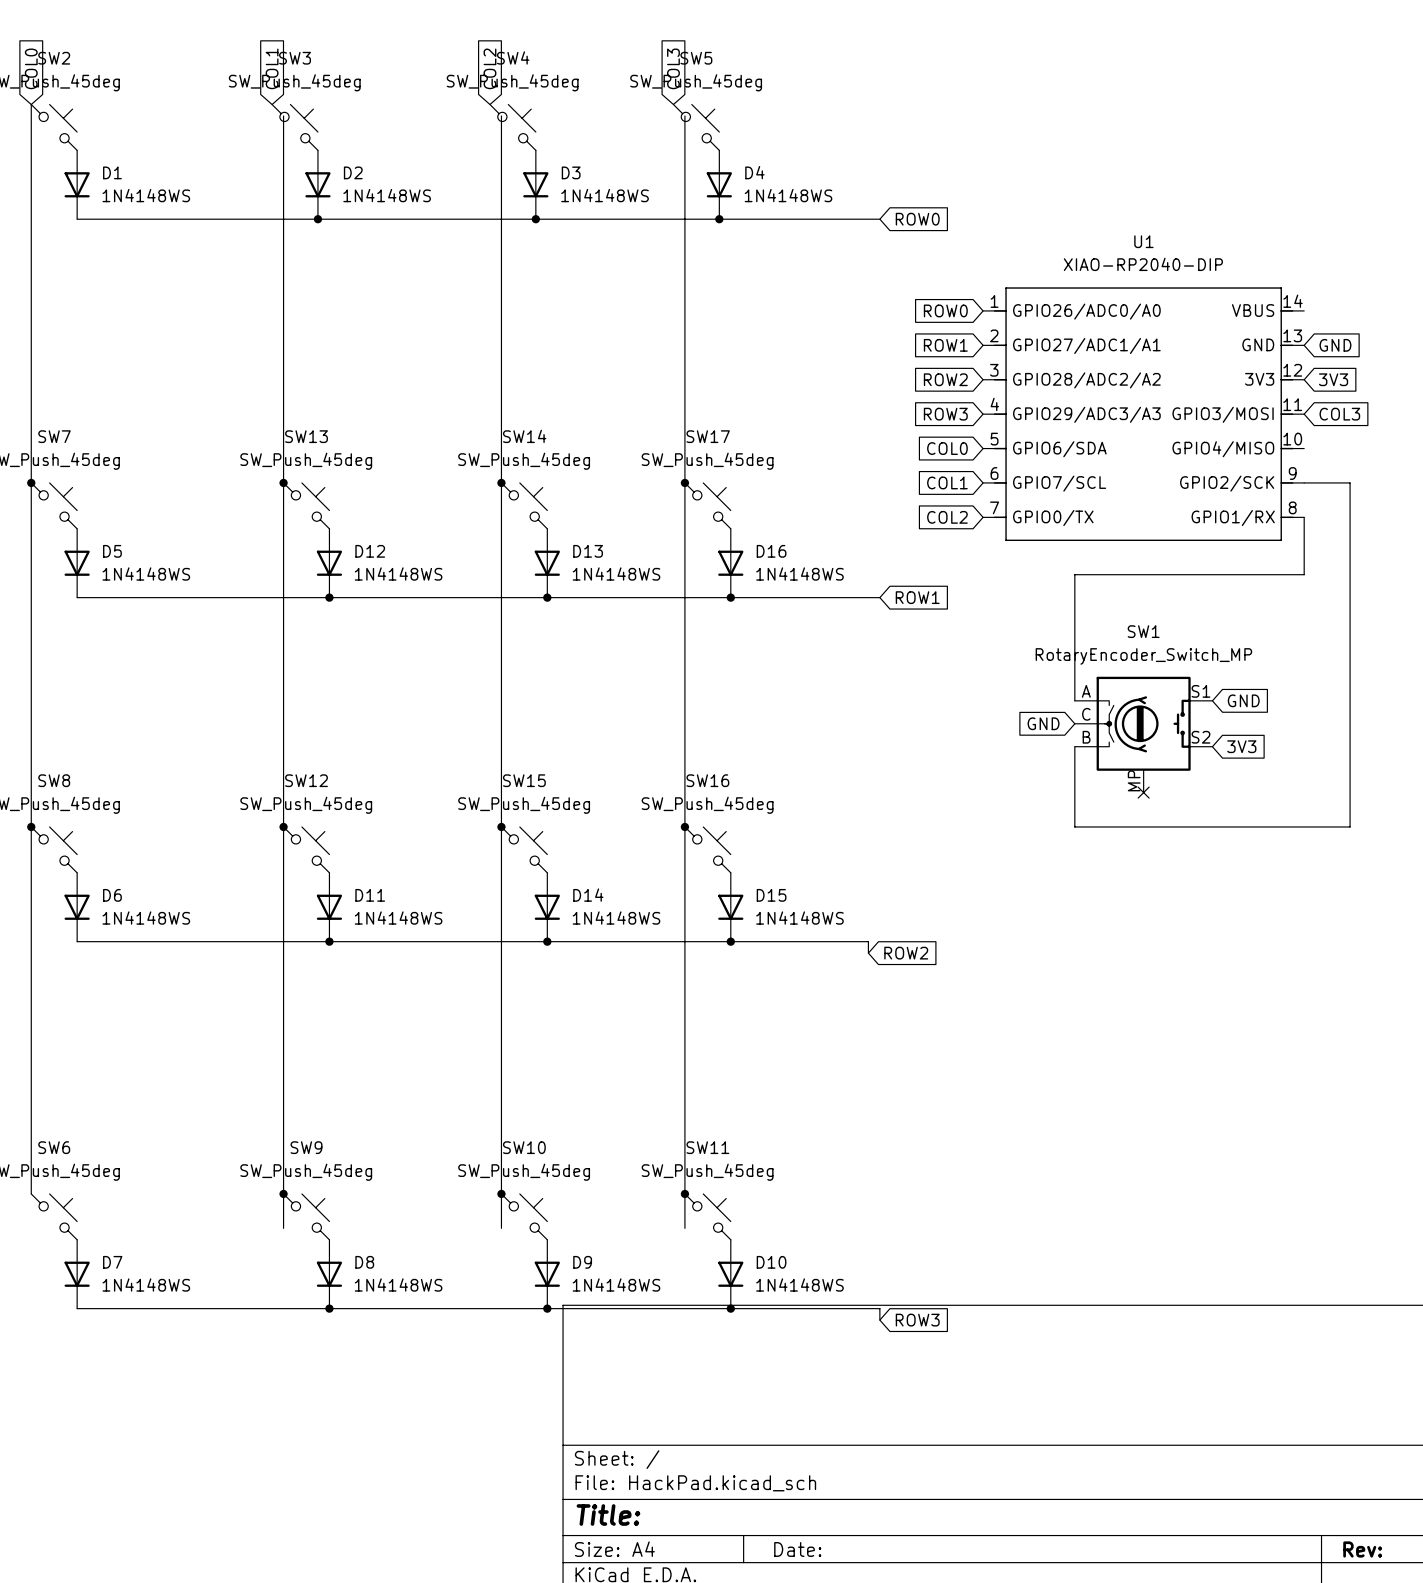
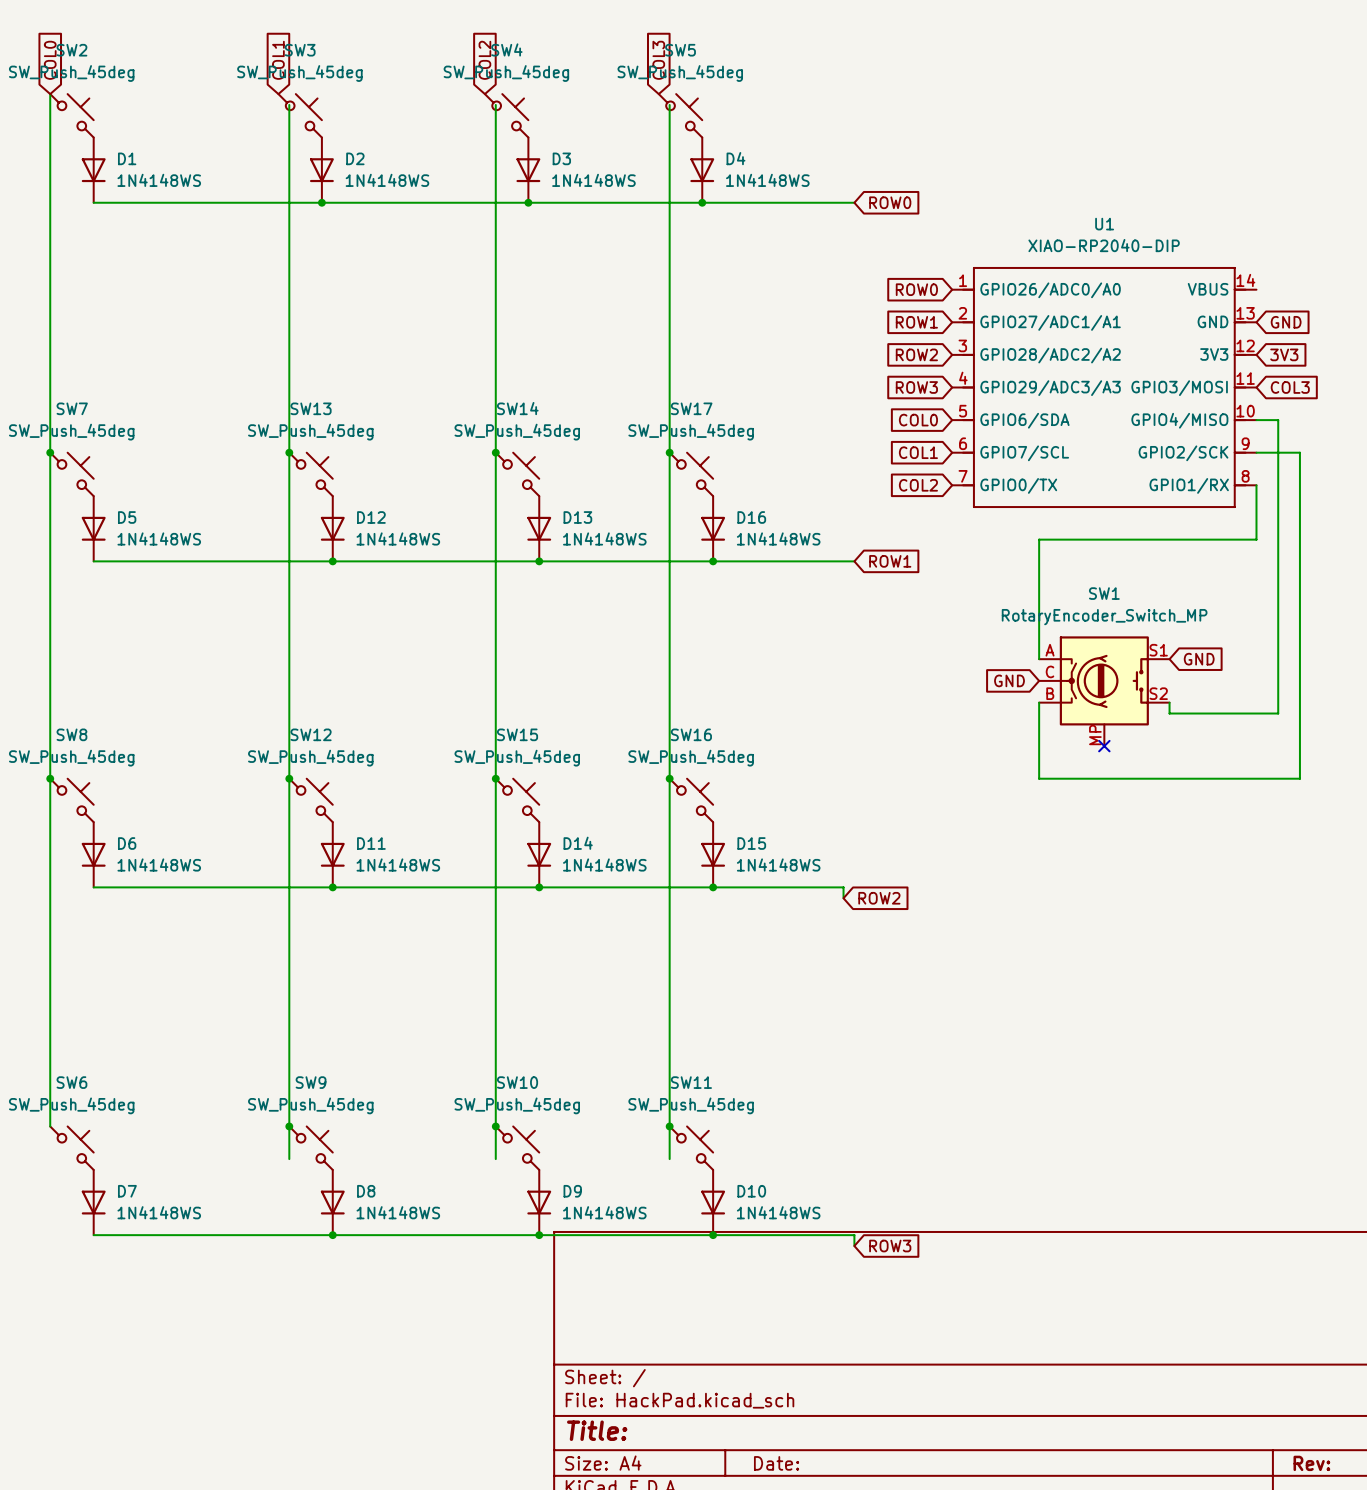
wire: none -> (1256, 420) (1278, 420) (1278, 713) (1169, 713) (1169, 702)
global label: 3V3 (1241, 746) -> none

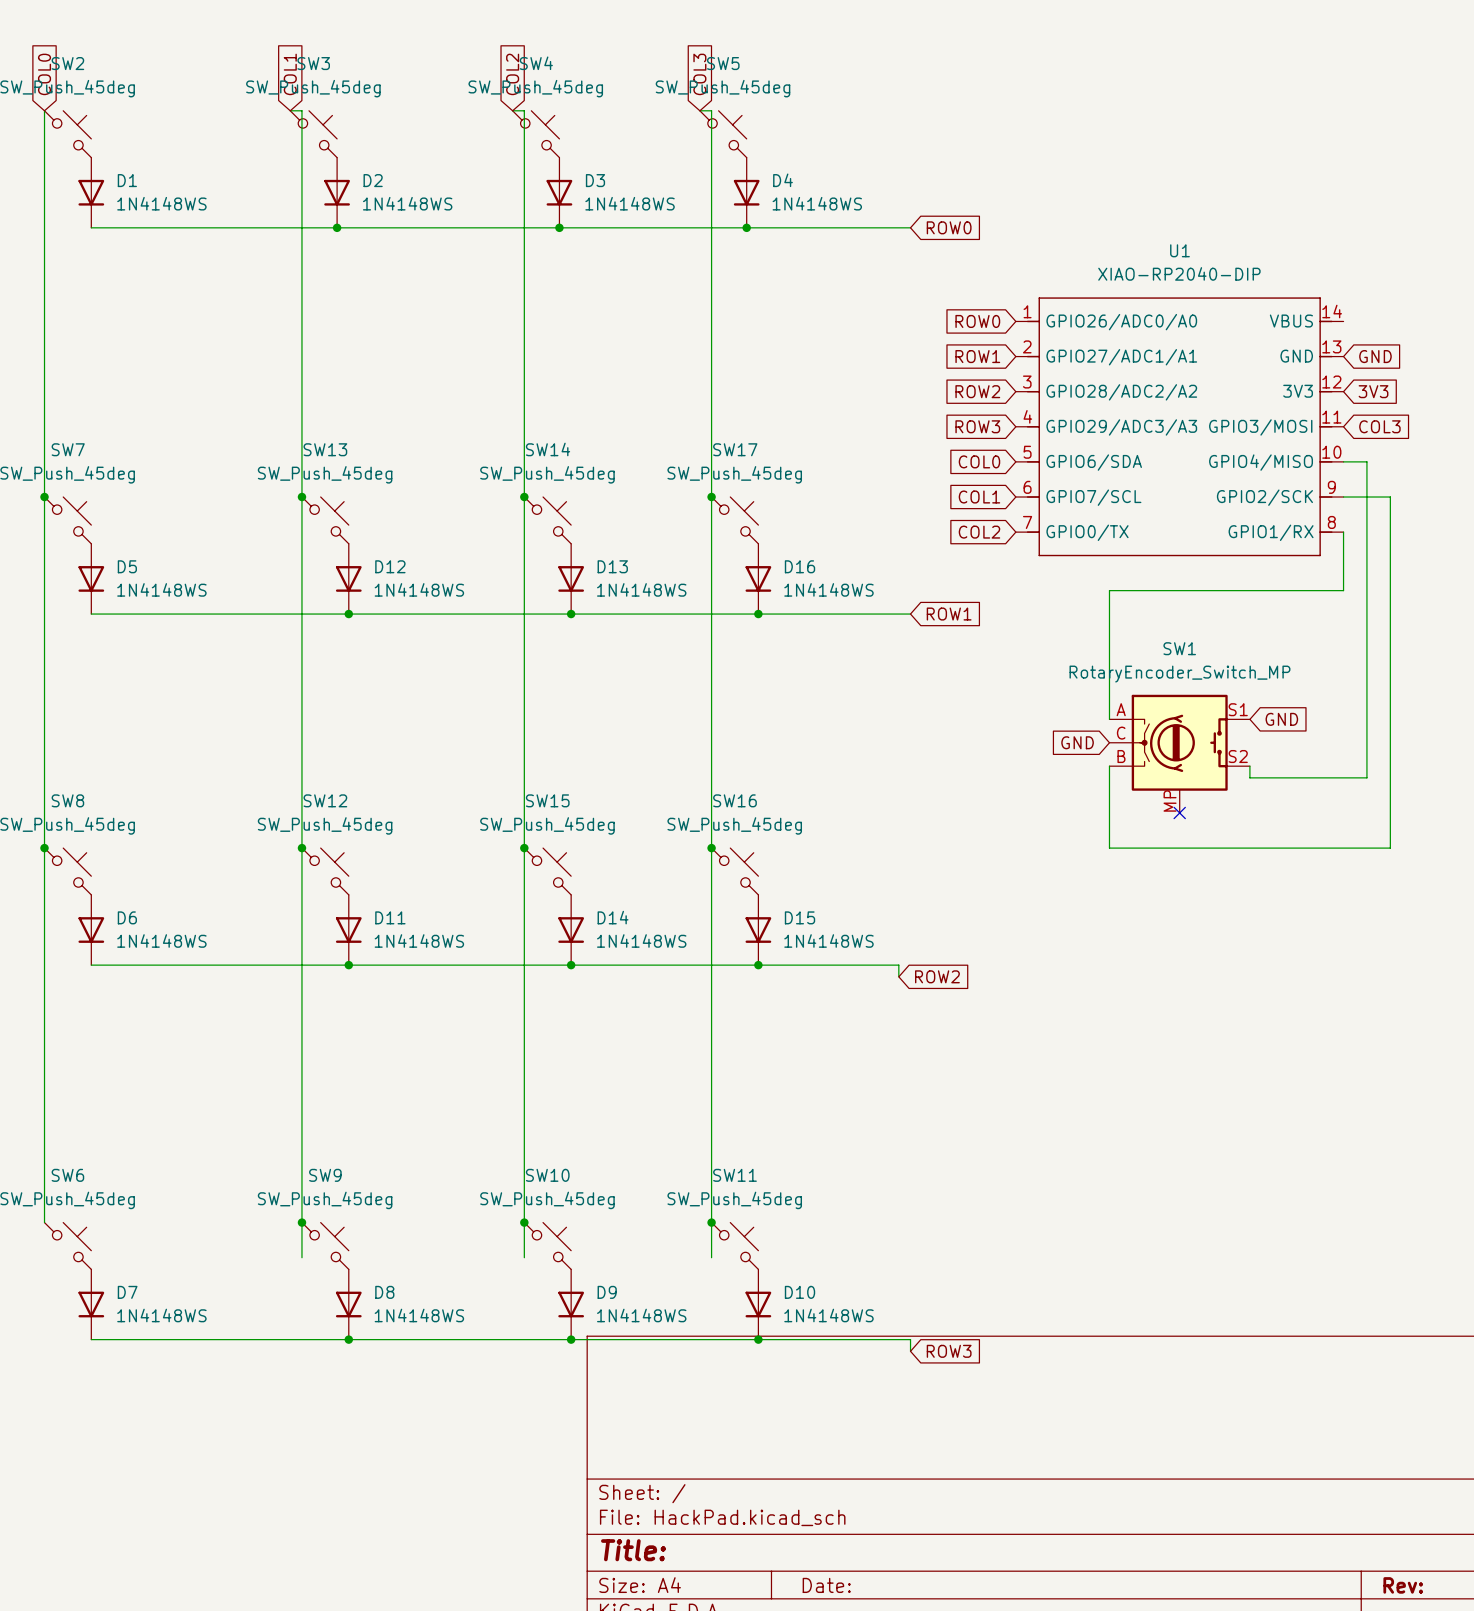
wire: none -> (290, 110) (301, 110) (301, 122)
wire: none -> (512, 110) (524, 110) (524, 122)
wire: none -> (699, 110) (711, 110) (711, 122)

